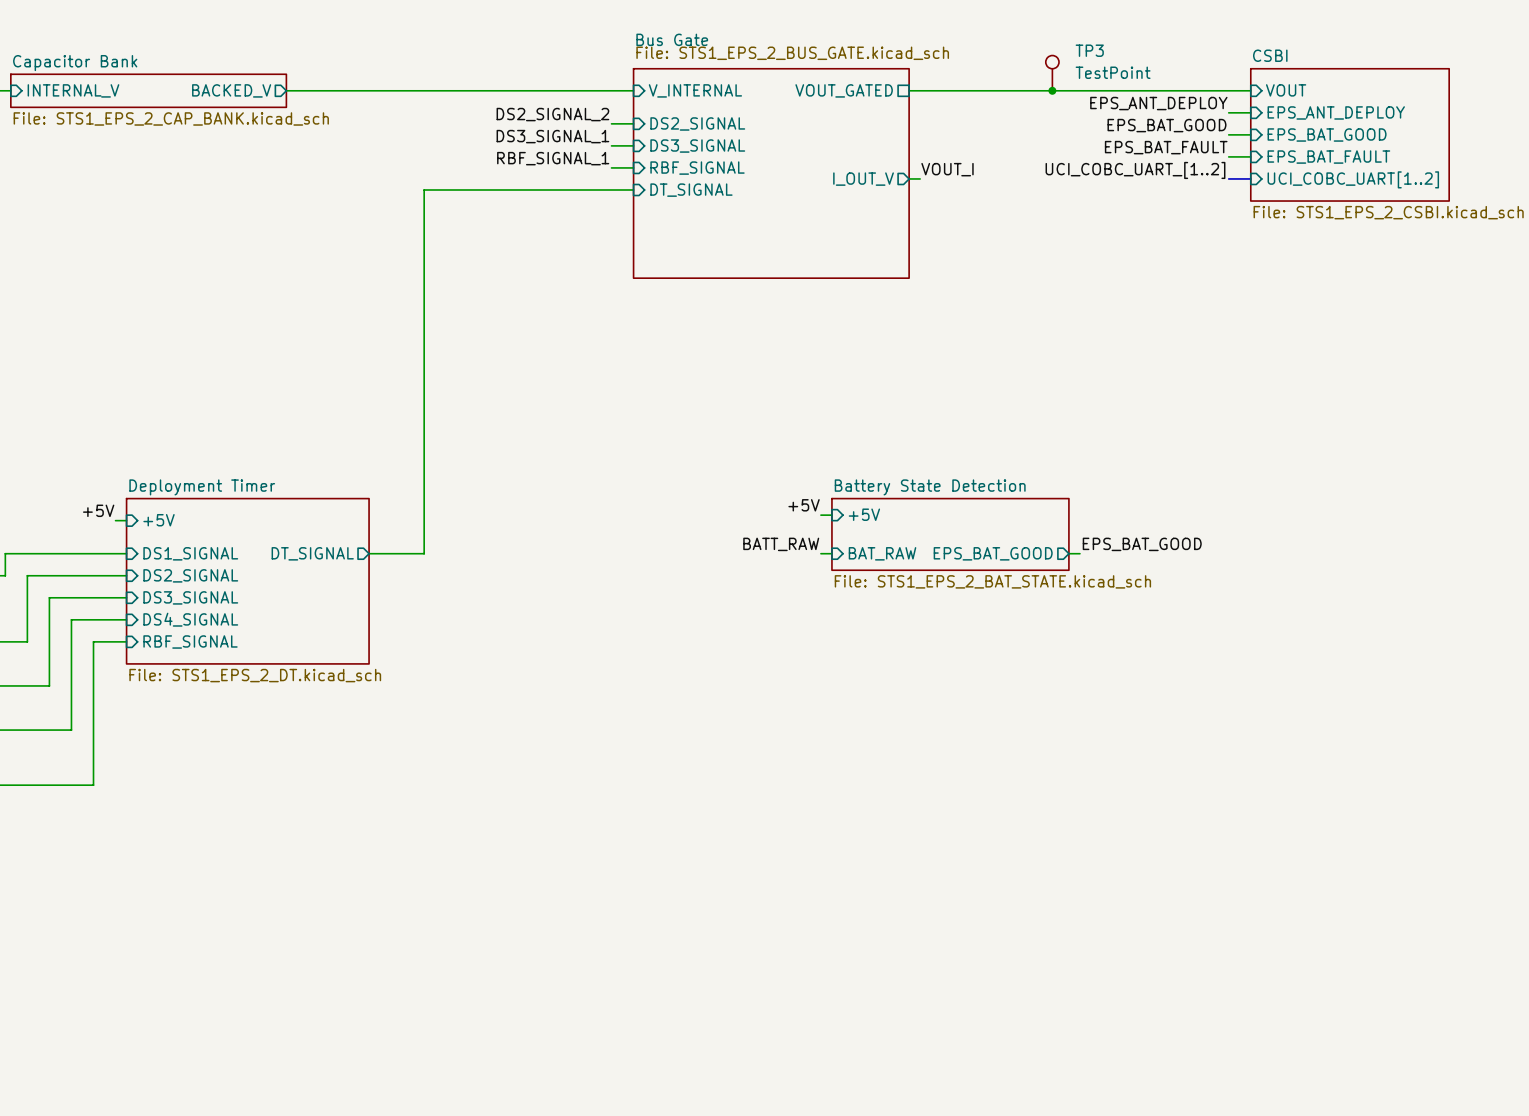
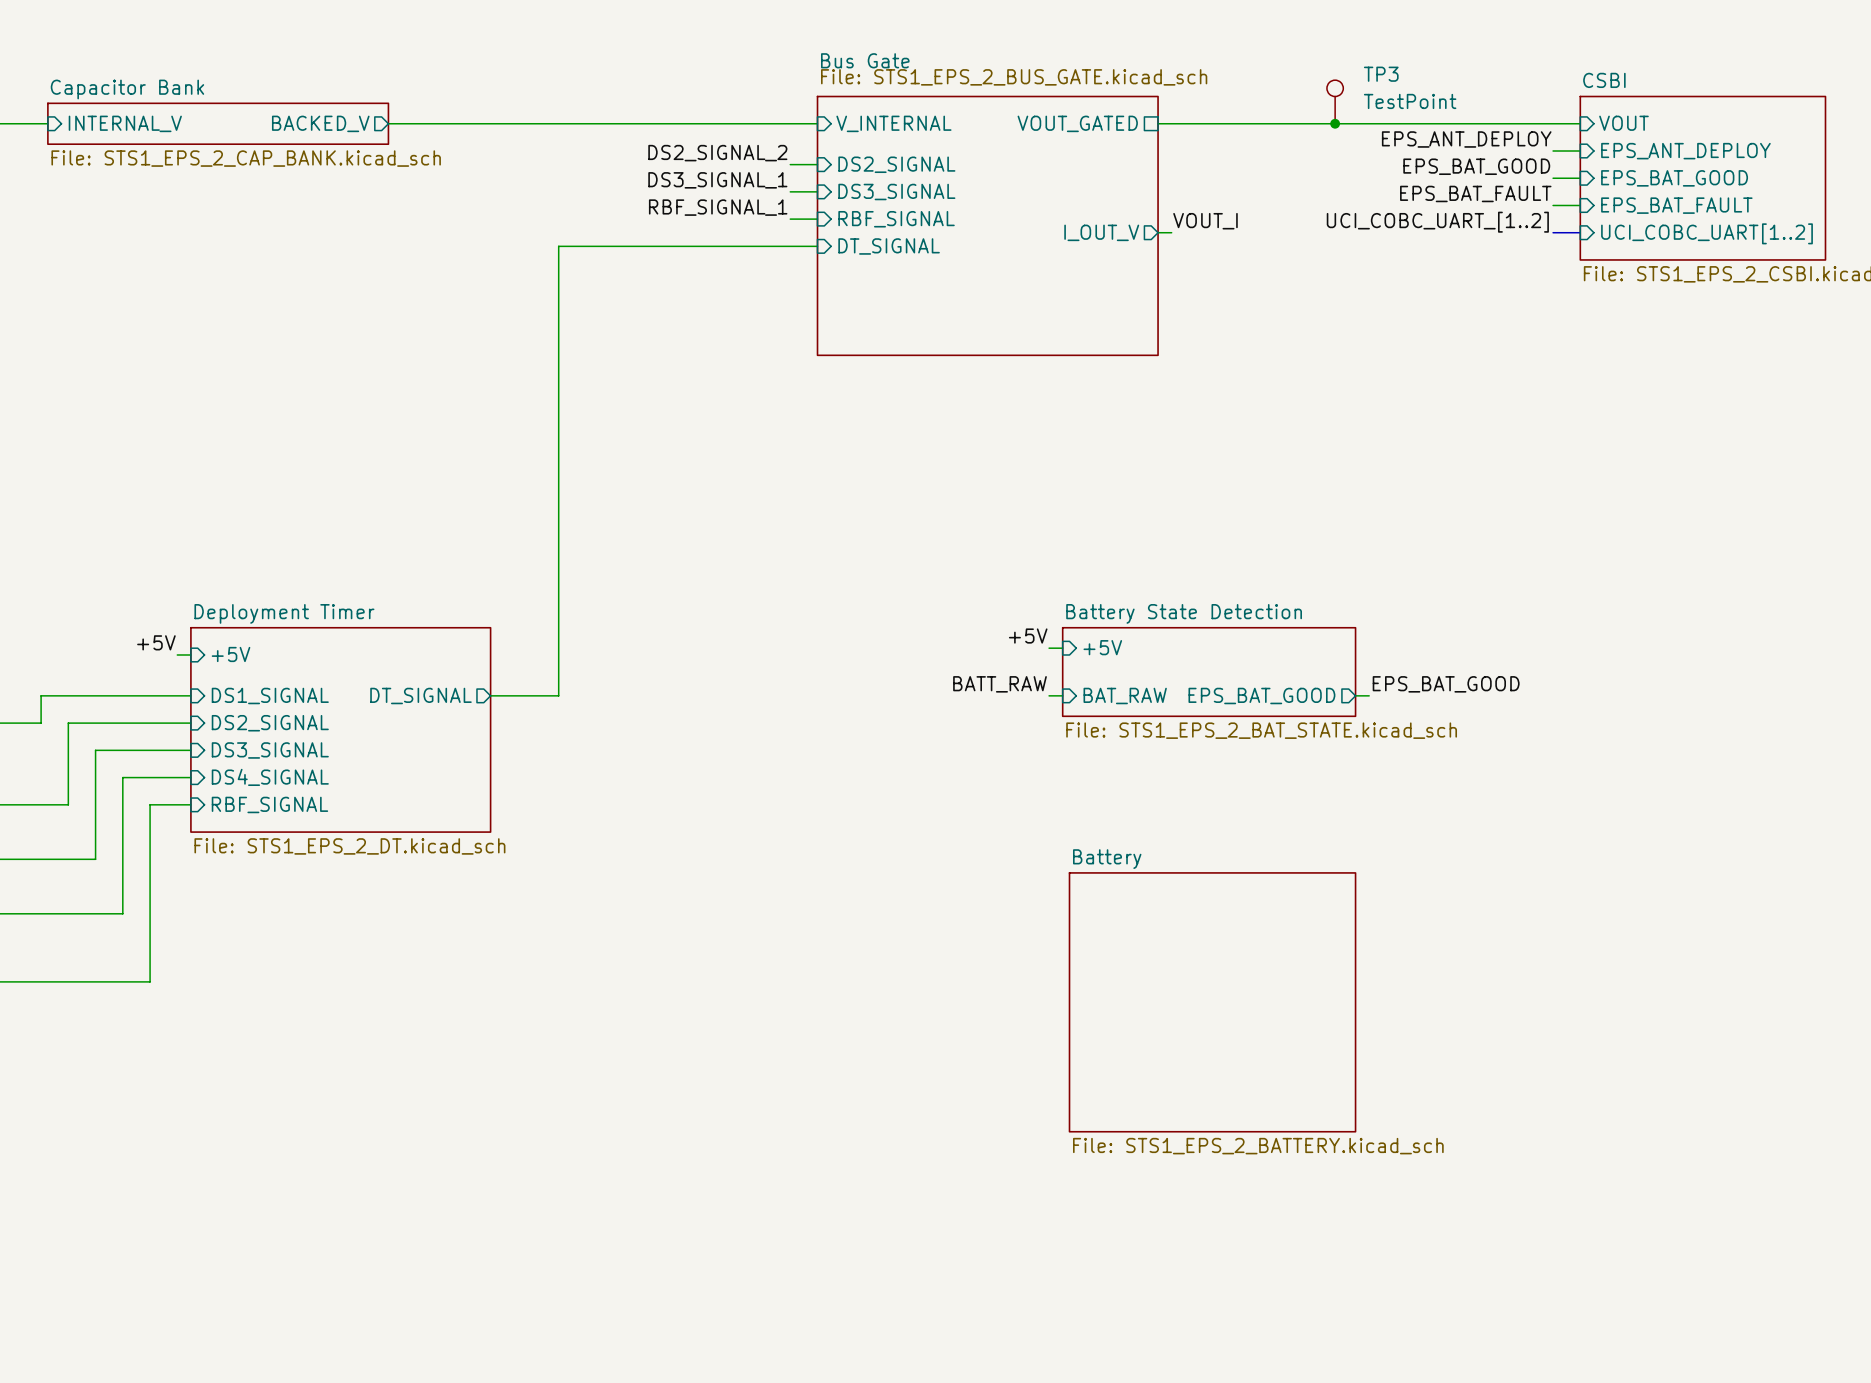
sheet Battery: none -> File: STS1_EPS_2_BATTERY.kicad_sch (1212, 1002)

